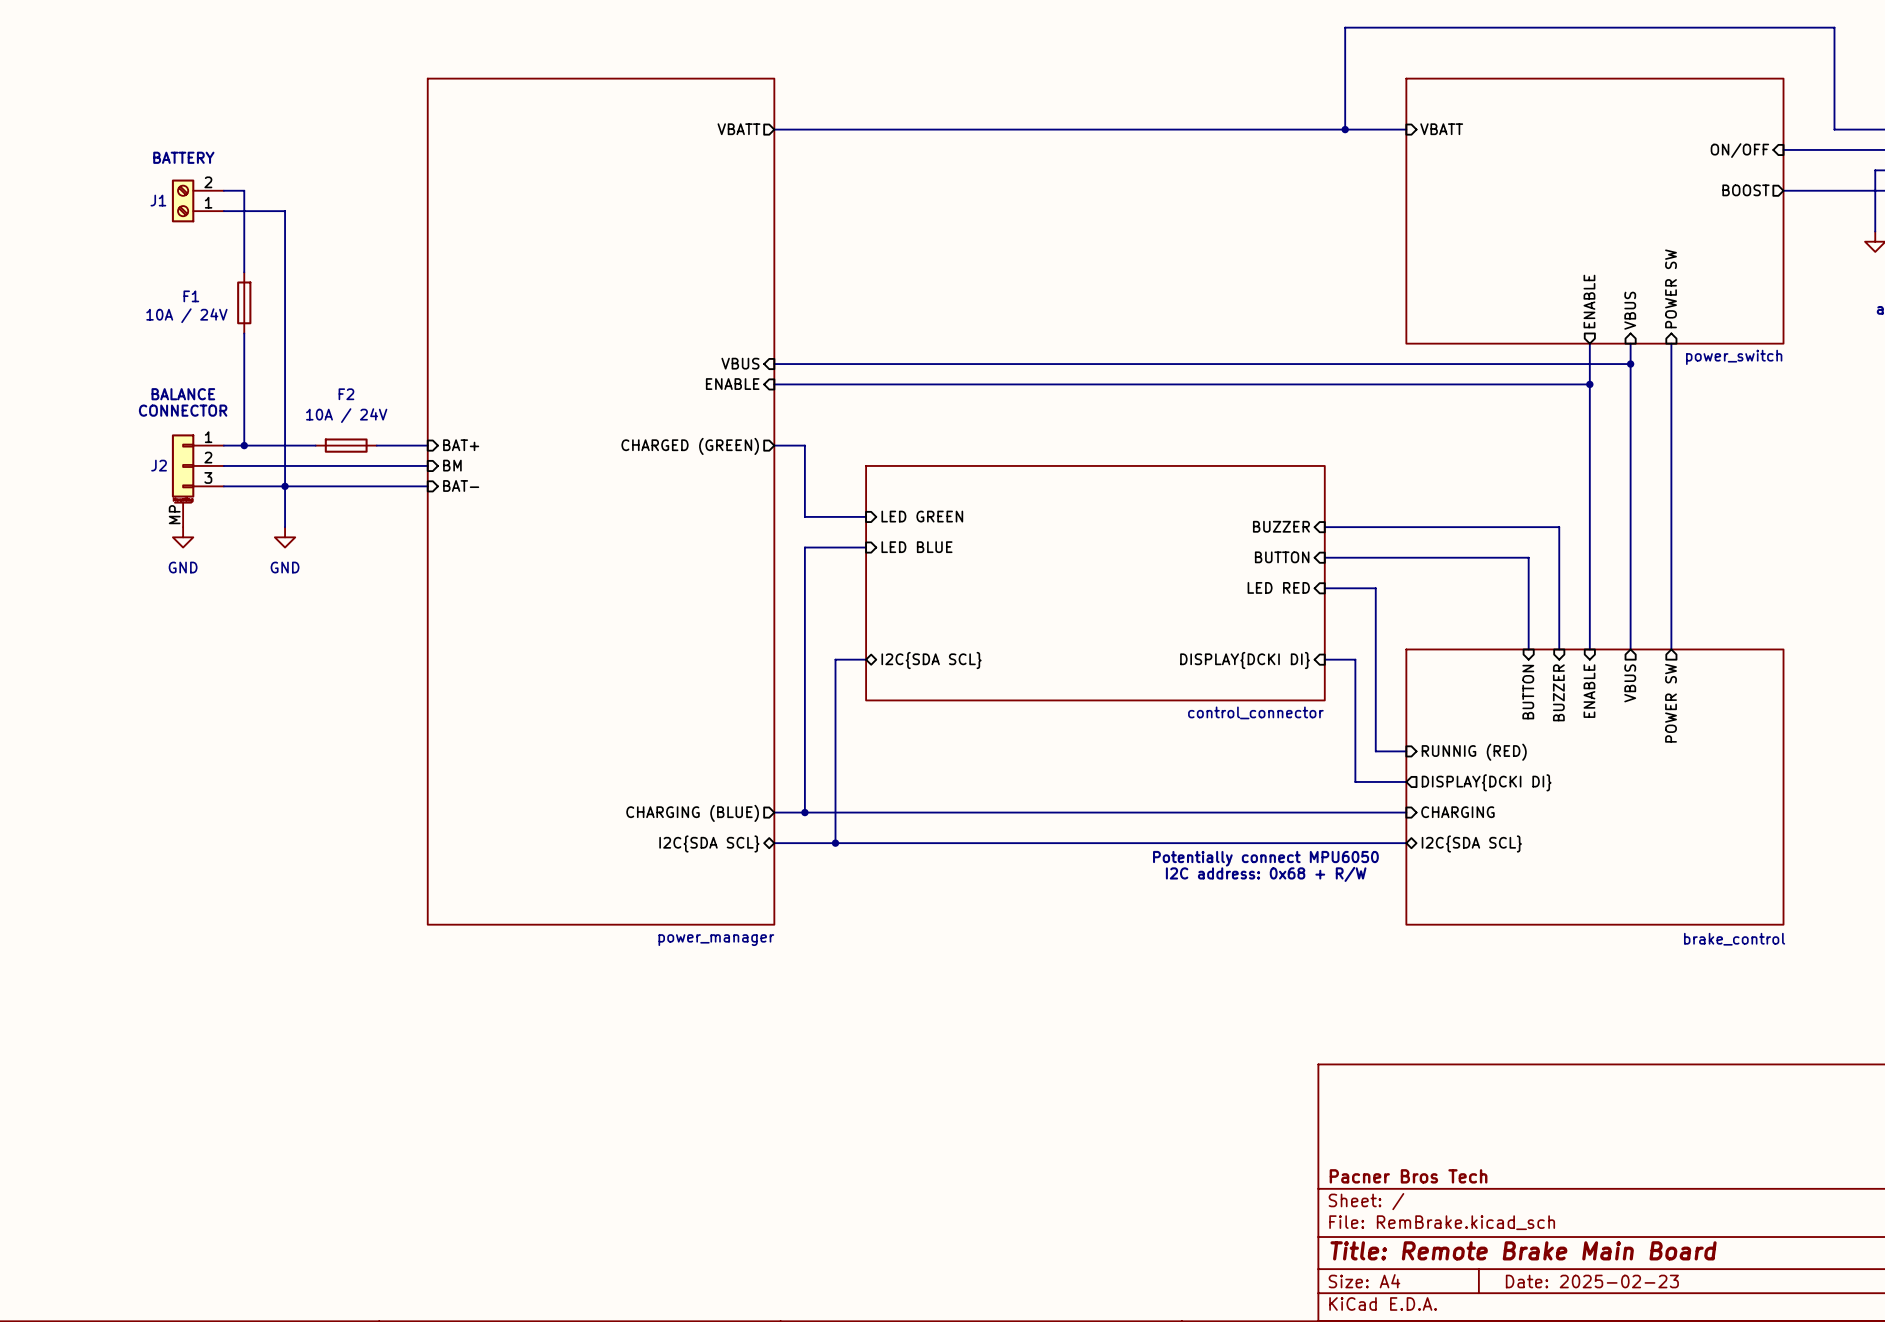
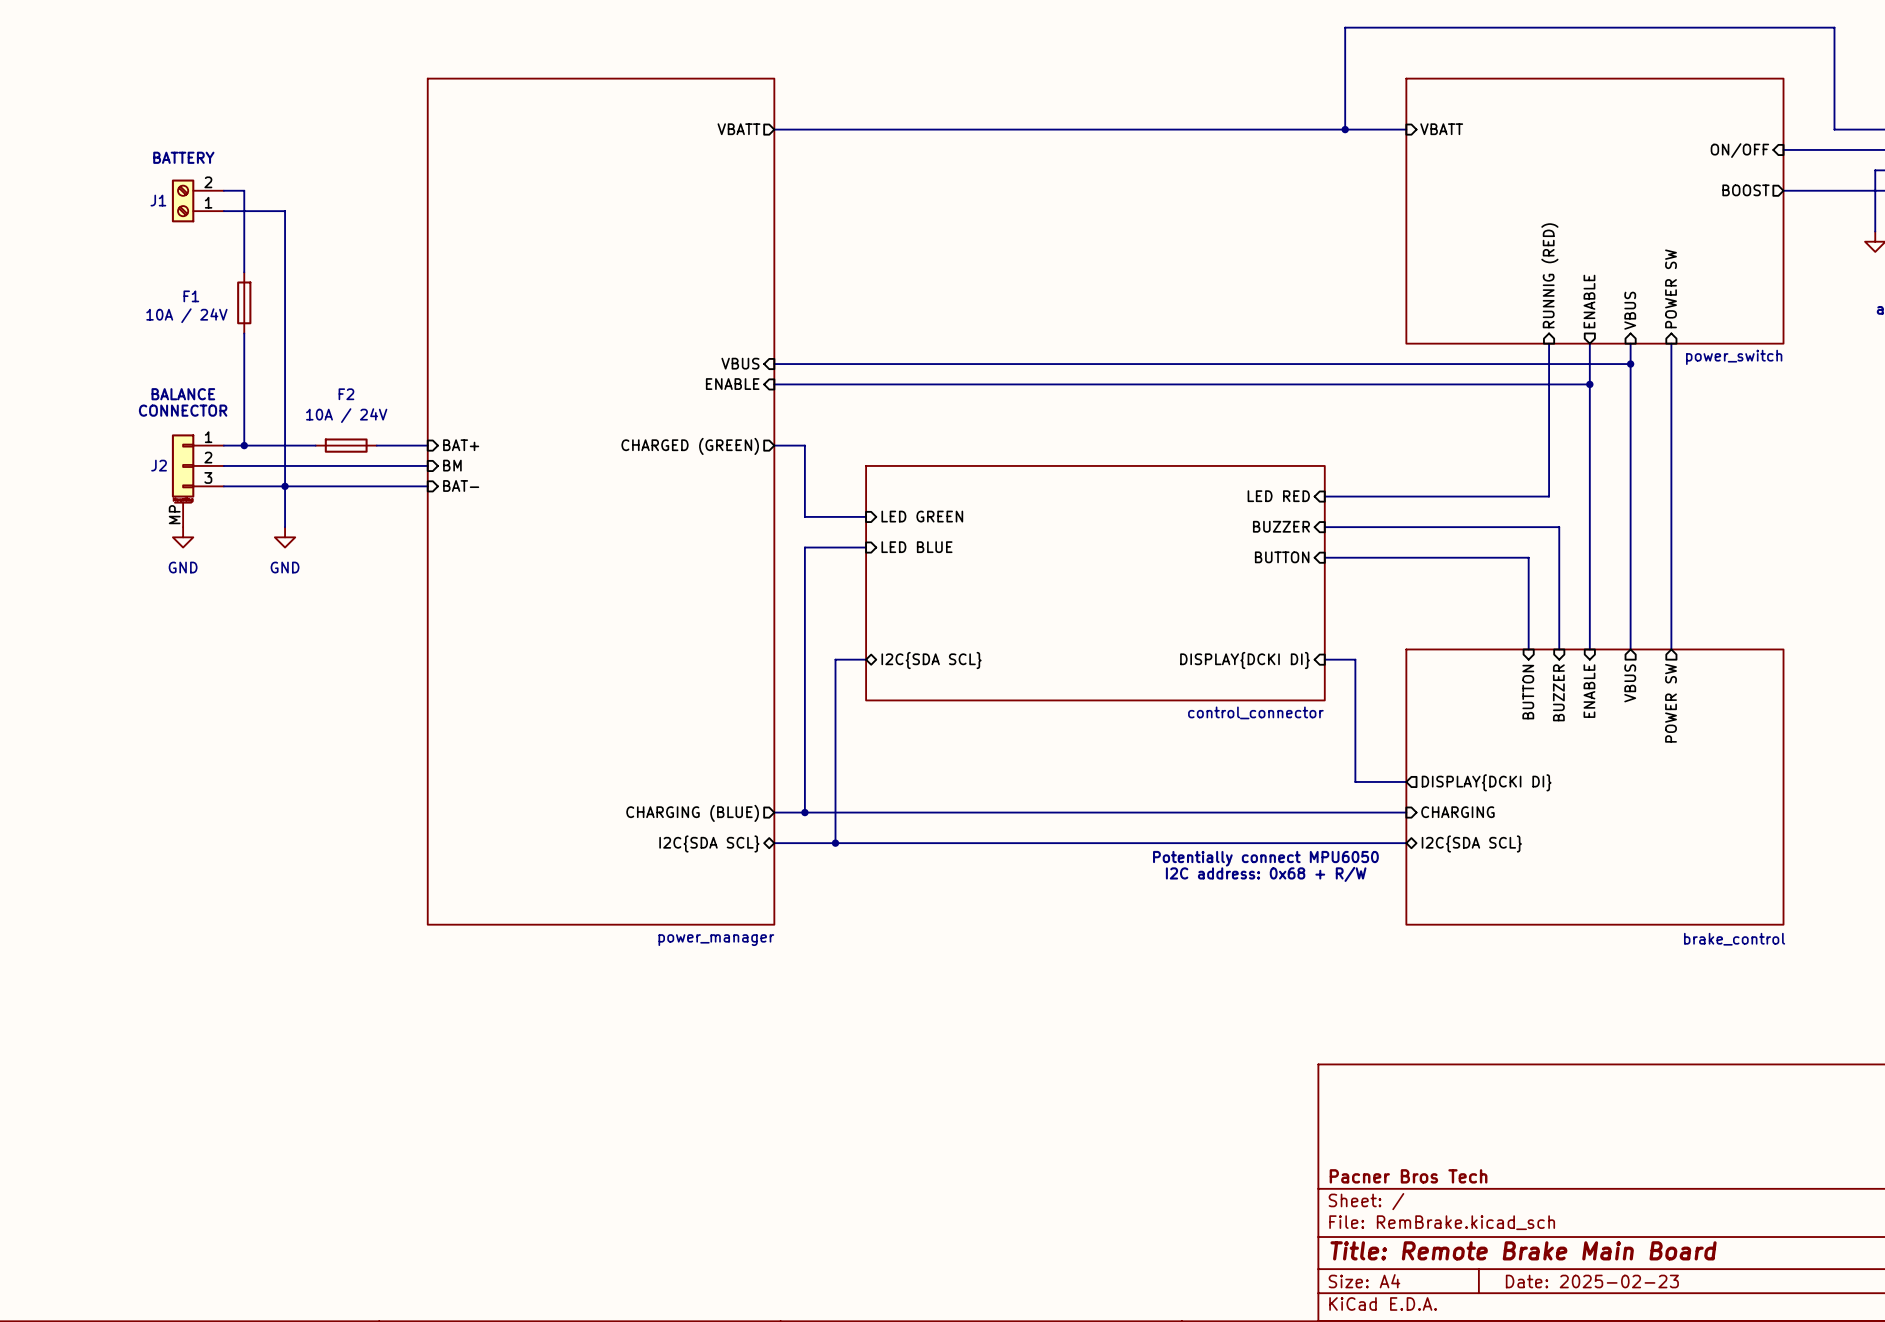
sheet pin: none -> RUNNIG (RED) (1549, 275)
wire: none -> (1549, 343) (1549, 496) (1324, 496)
sheet pin position: LED RED (1278, 587) -> LED RED (1278, 496)
wire: (1324, 588) (1375, 588) (1375, 751) (1406, 751) -> none
sheet pin: RUNNIG (RED) (1474, 752) -> none

